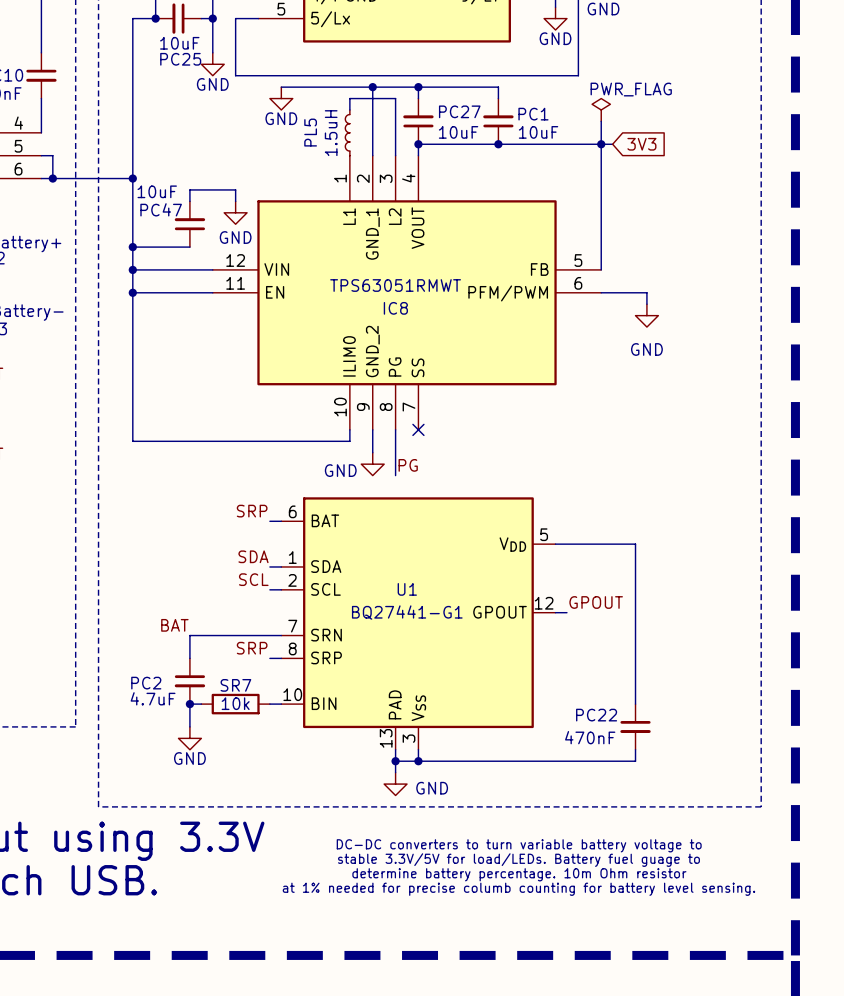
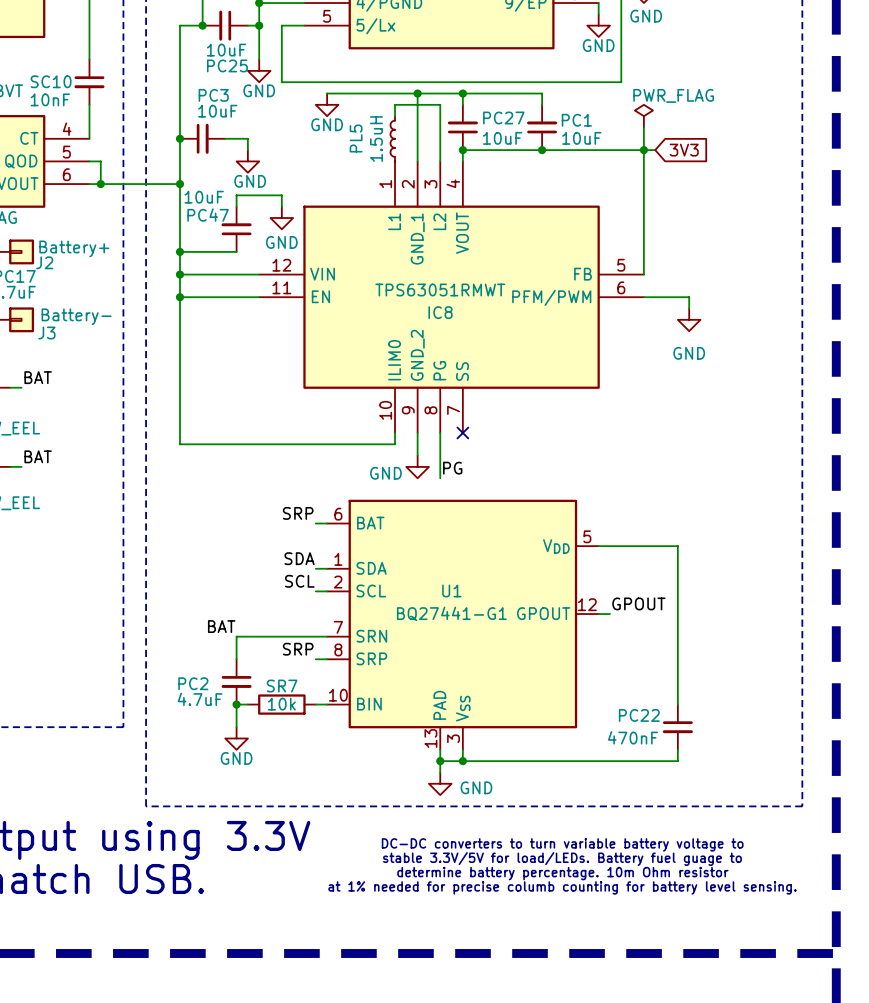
junction: none -> (180, 138)
PC3: none -> 10uF (202, 138)
wire: none -> (225, 138) (247, 138) (247, 150)
power symbol: none -> GND (247, 161)

